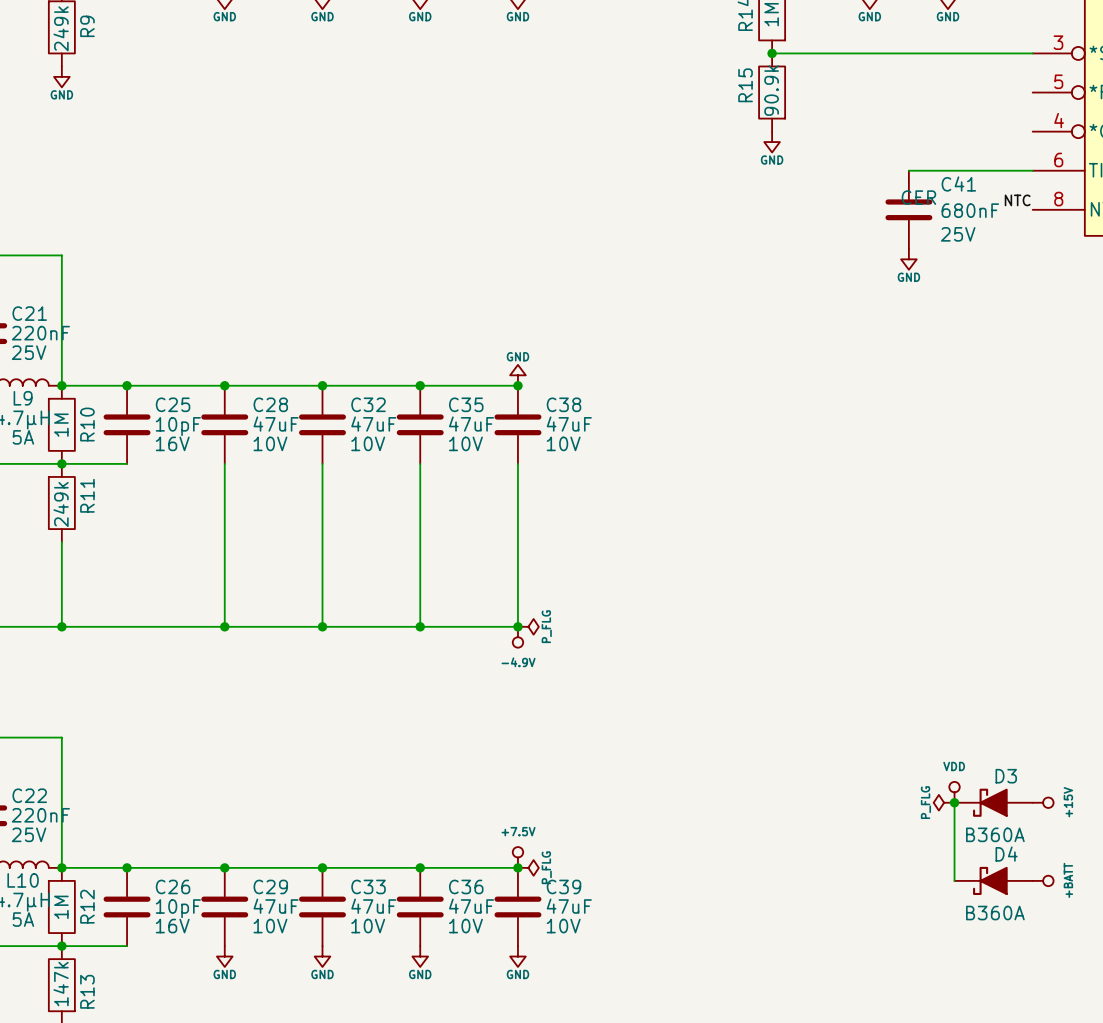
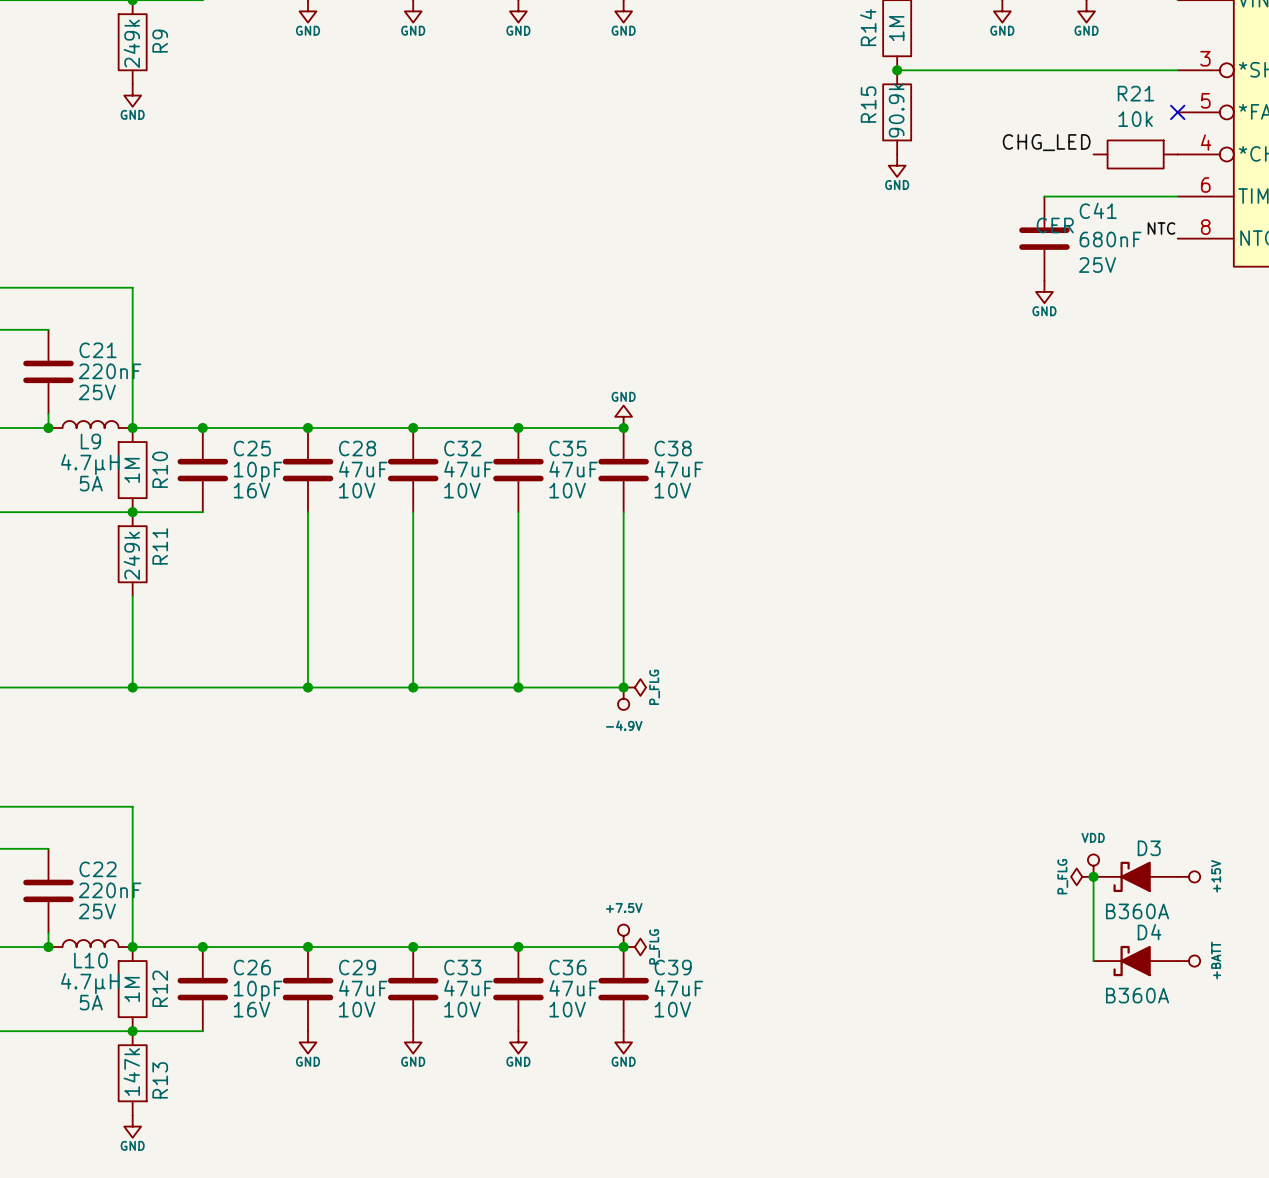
no-connect mark: none -> (1177, 112)
label: none -> CHG_LED (1046, 142)
R21: none -> (1135, 154)

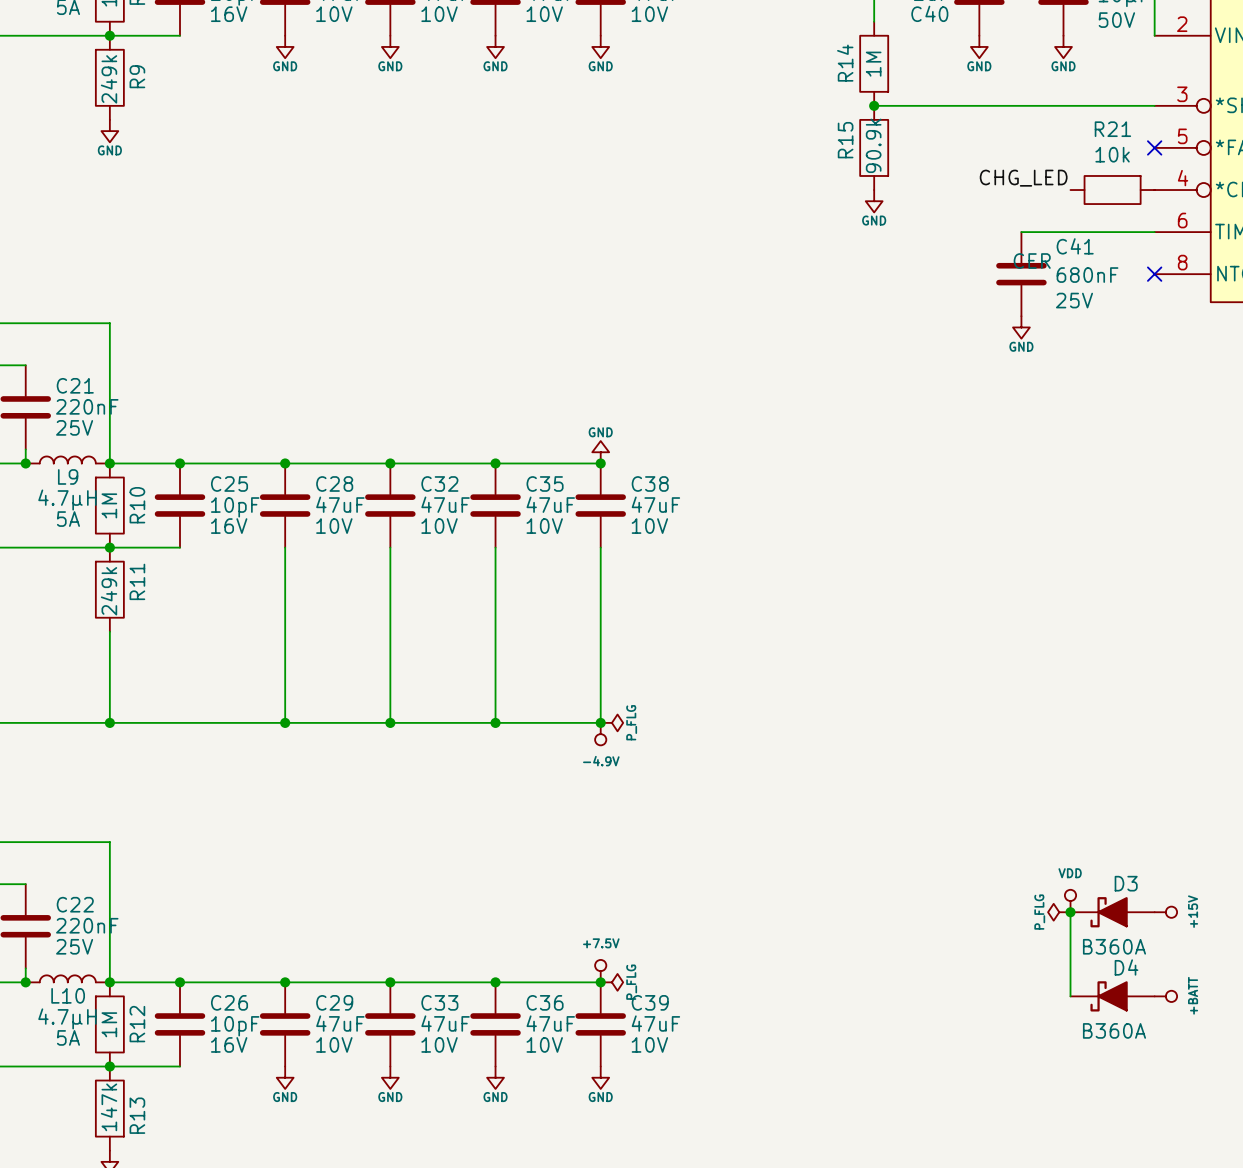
label: NTC (1161, 228) -> none
no-connect mark: none -> (1154, 274)

